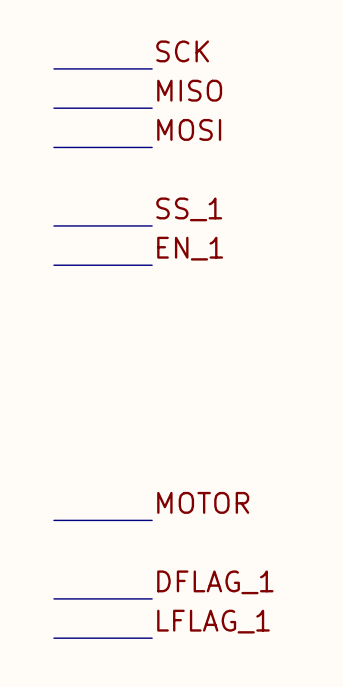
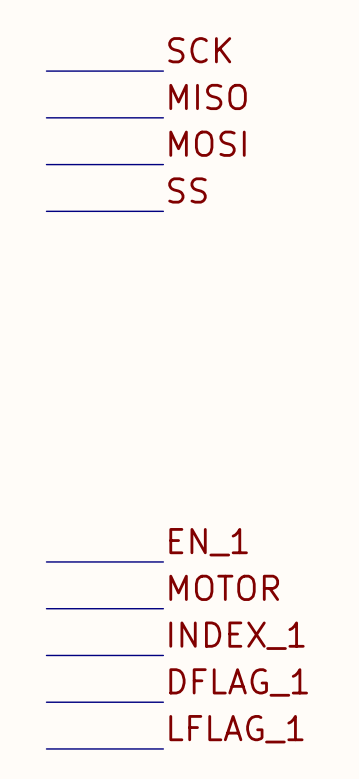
label: SS_1 (189, 209) -> SS (187, 190)
wire: (53, 225) (152, 225) -> (46, 211) (163, 211)
label position: EN_1 (190, 248) -> EN_1 (208, 542)
wire: (53, 265) (152, 265) -> (46, 561) (163, 561)
label: none -> INDEX_1 (237, 635)
wire: none -> (46, 655) (163, 655)

